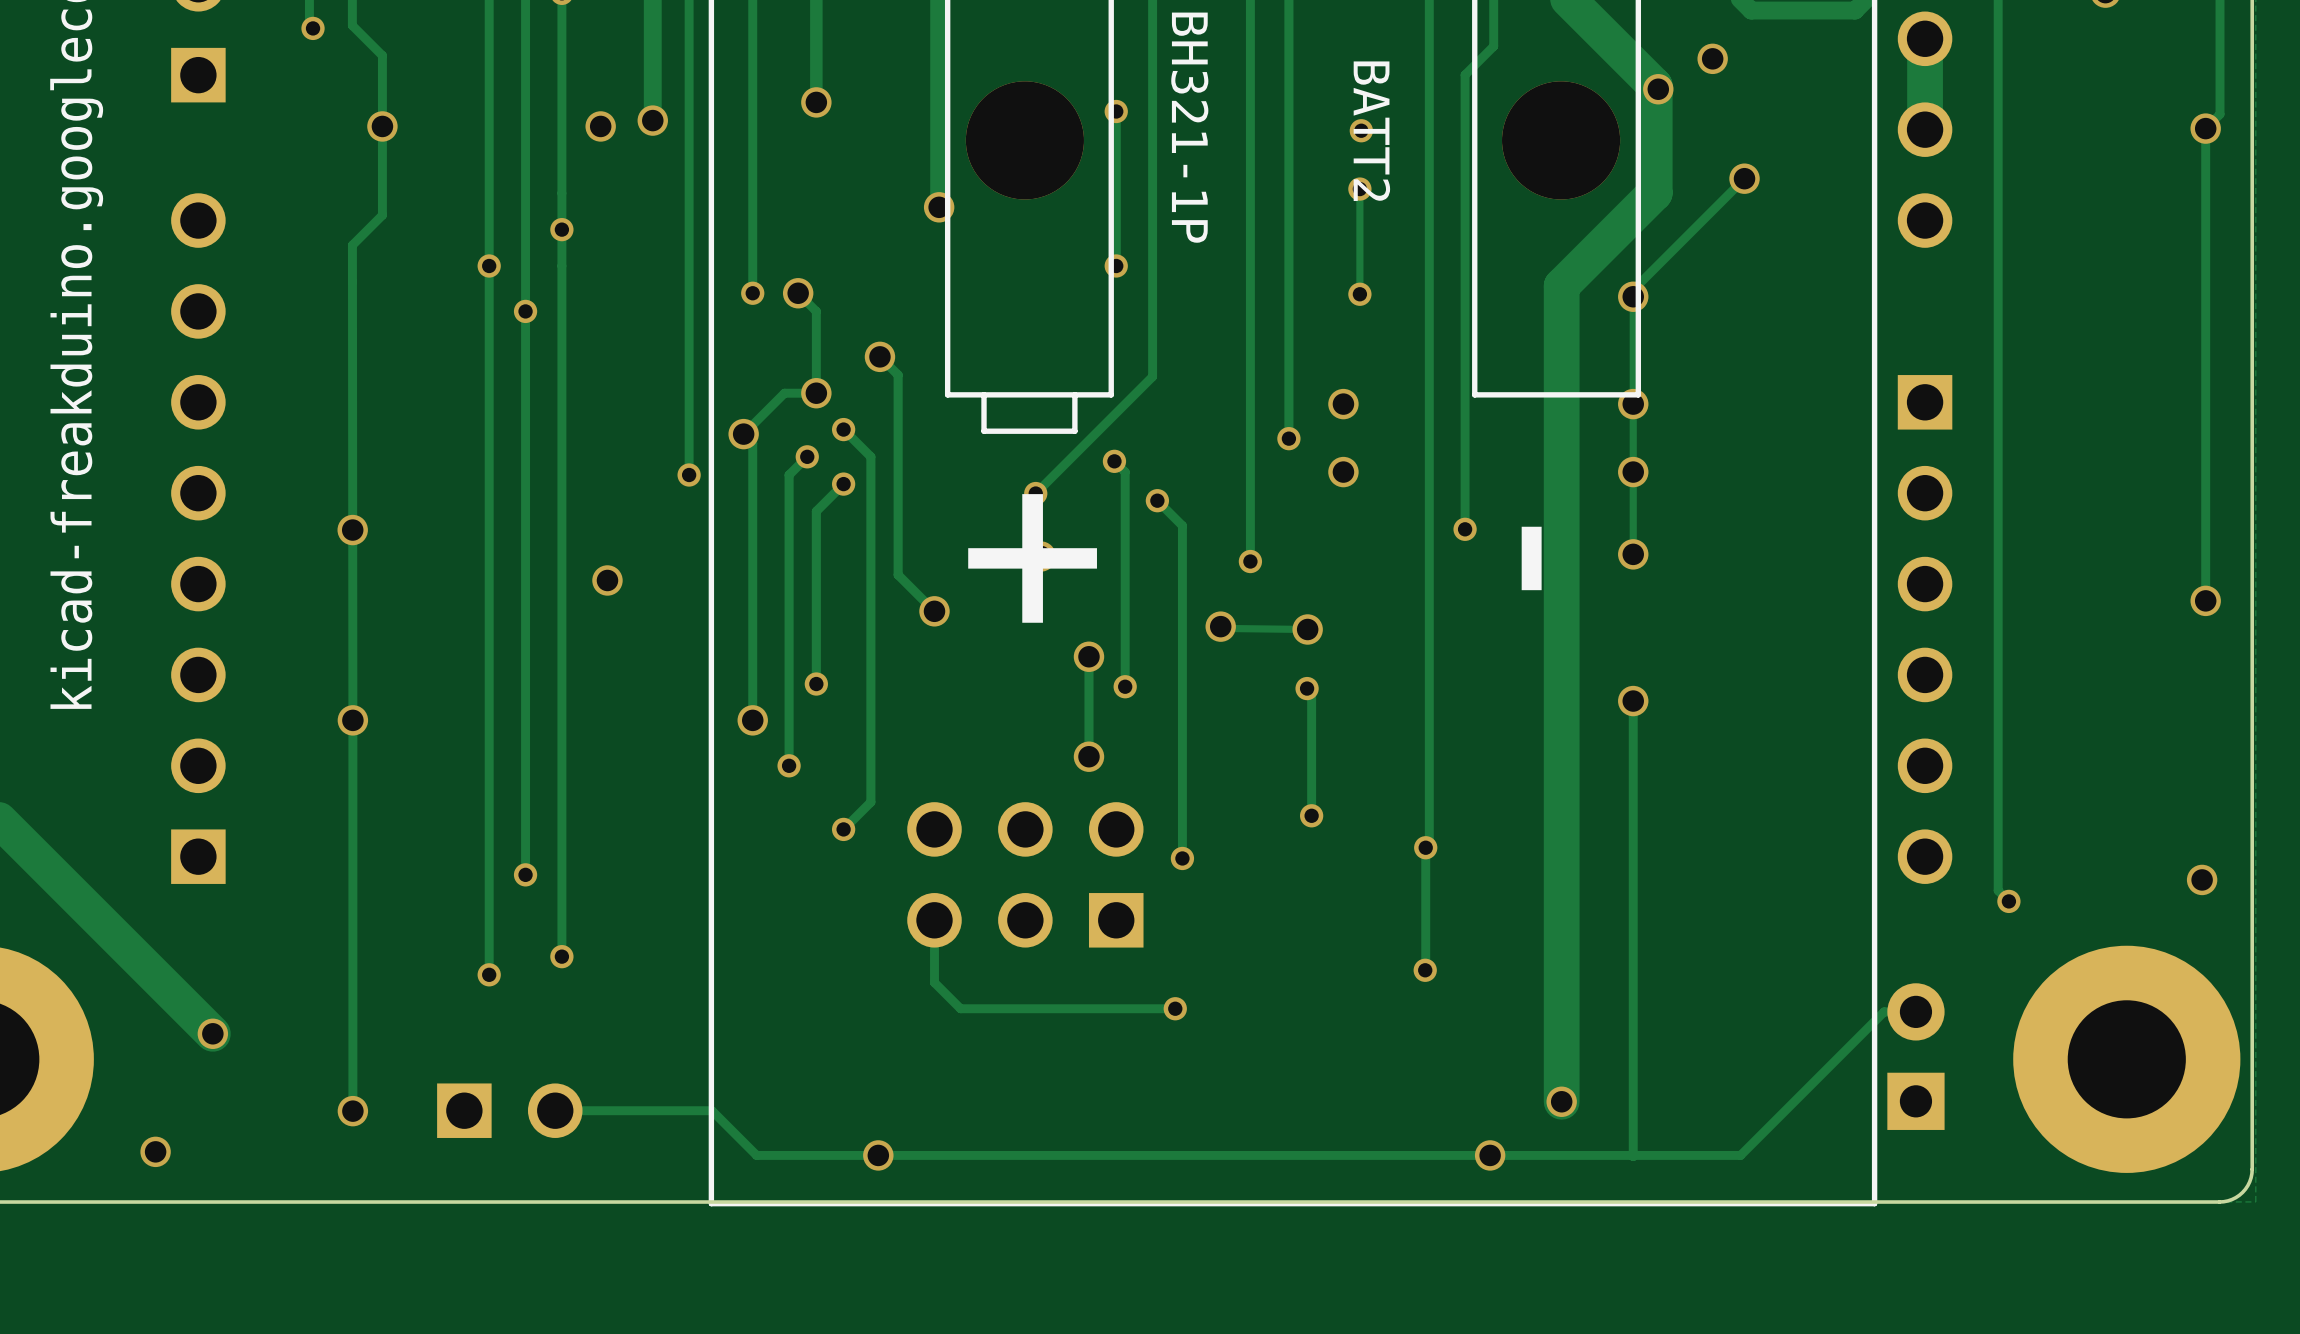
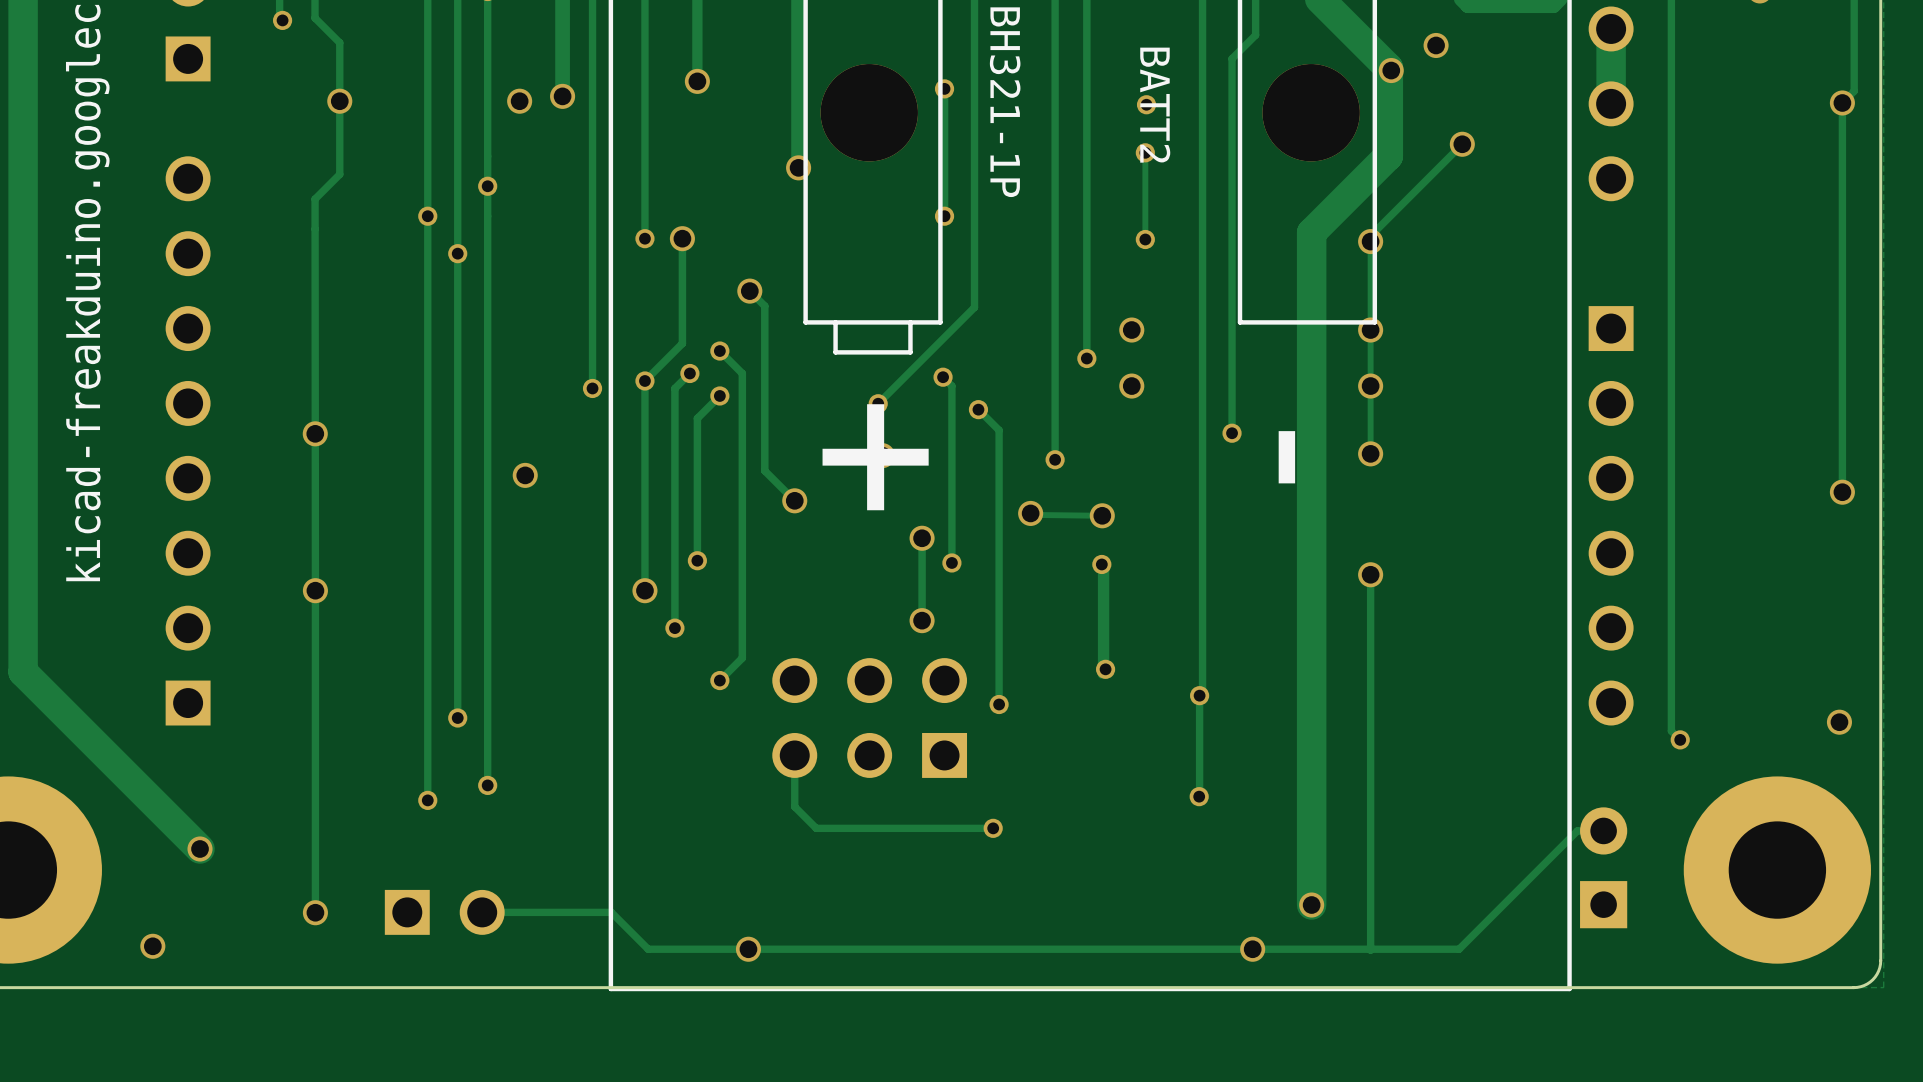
track: (798, 293) (816, 311) (816, 393) (784, 393) (743, 434) (752, 443) (752, 465) -> (682, 238) (682, 343) (644, 380)
via: (816, 393) -> none
via: (743, 434) -> none
via: none -> (644, 380)
track: none -> (1101, 562) (1101, 675)

